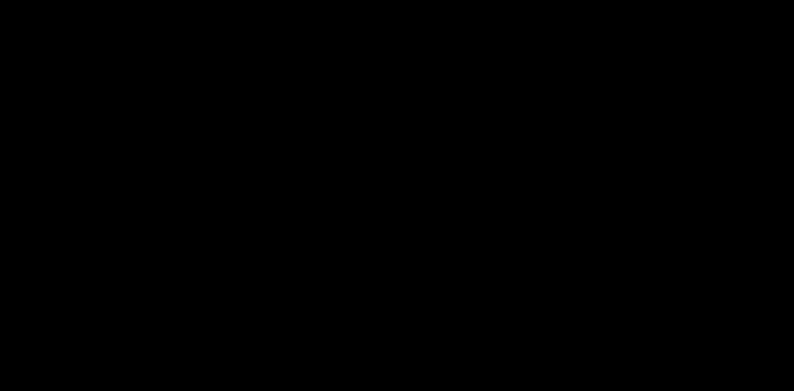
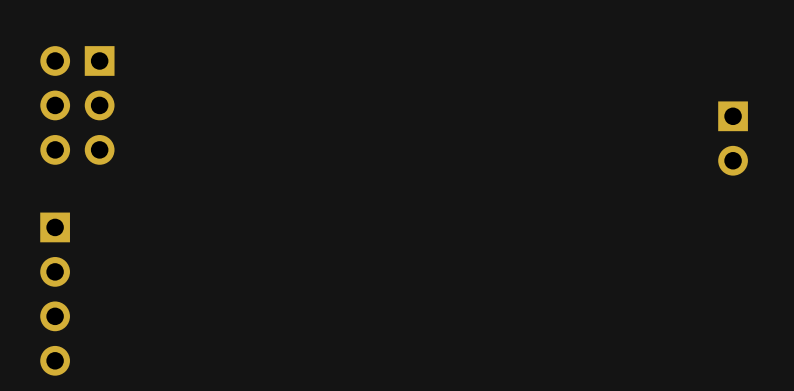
part: none -> (77, 105)
part: none -> (733, 138)
part: none -> (55, 294)

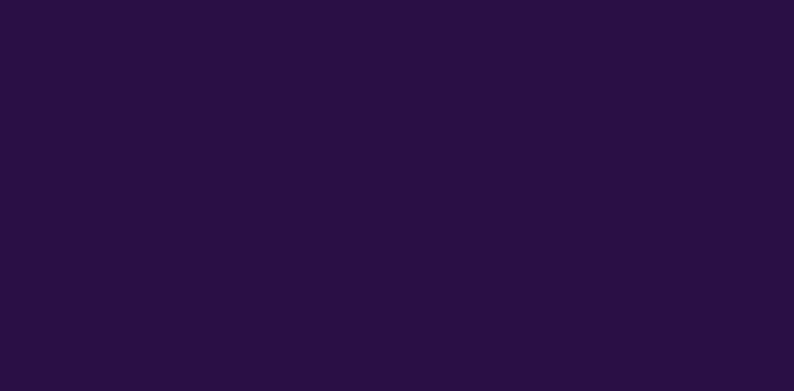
part: (77, 105) -> none
part: (733, 138) -> none
part: (55, 294) -> none

